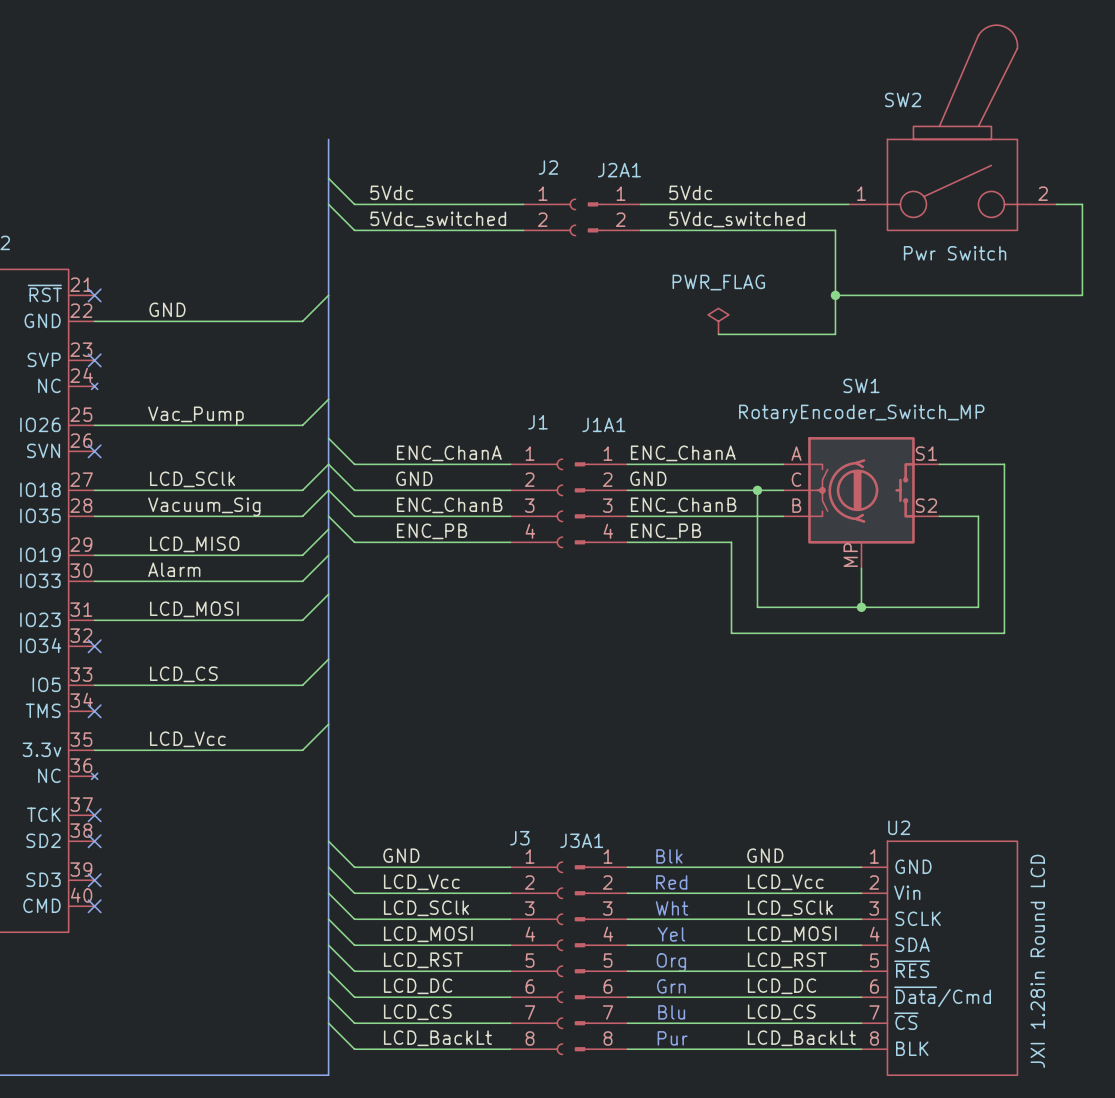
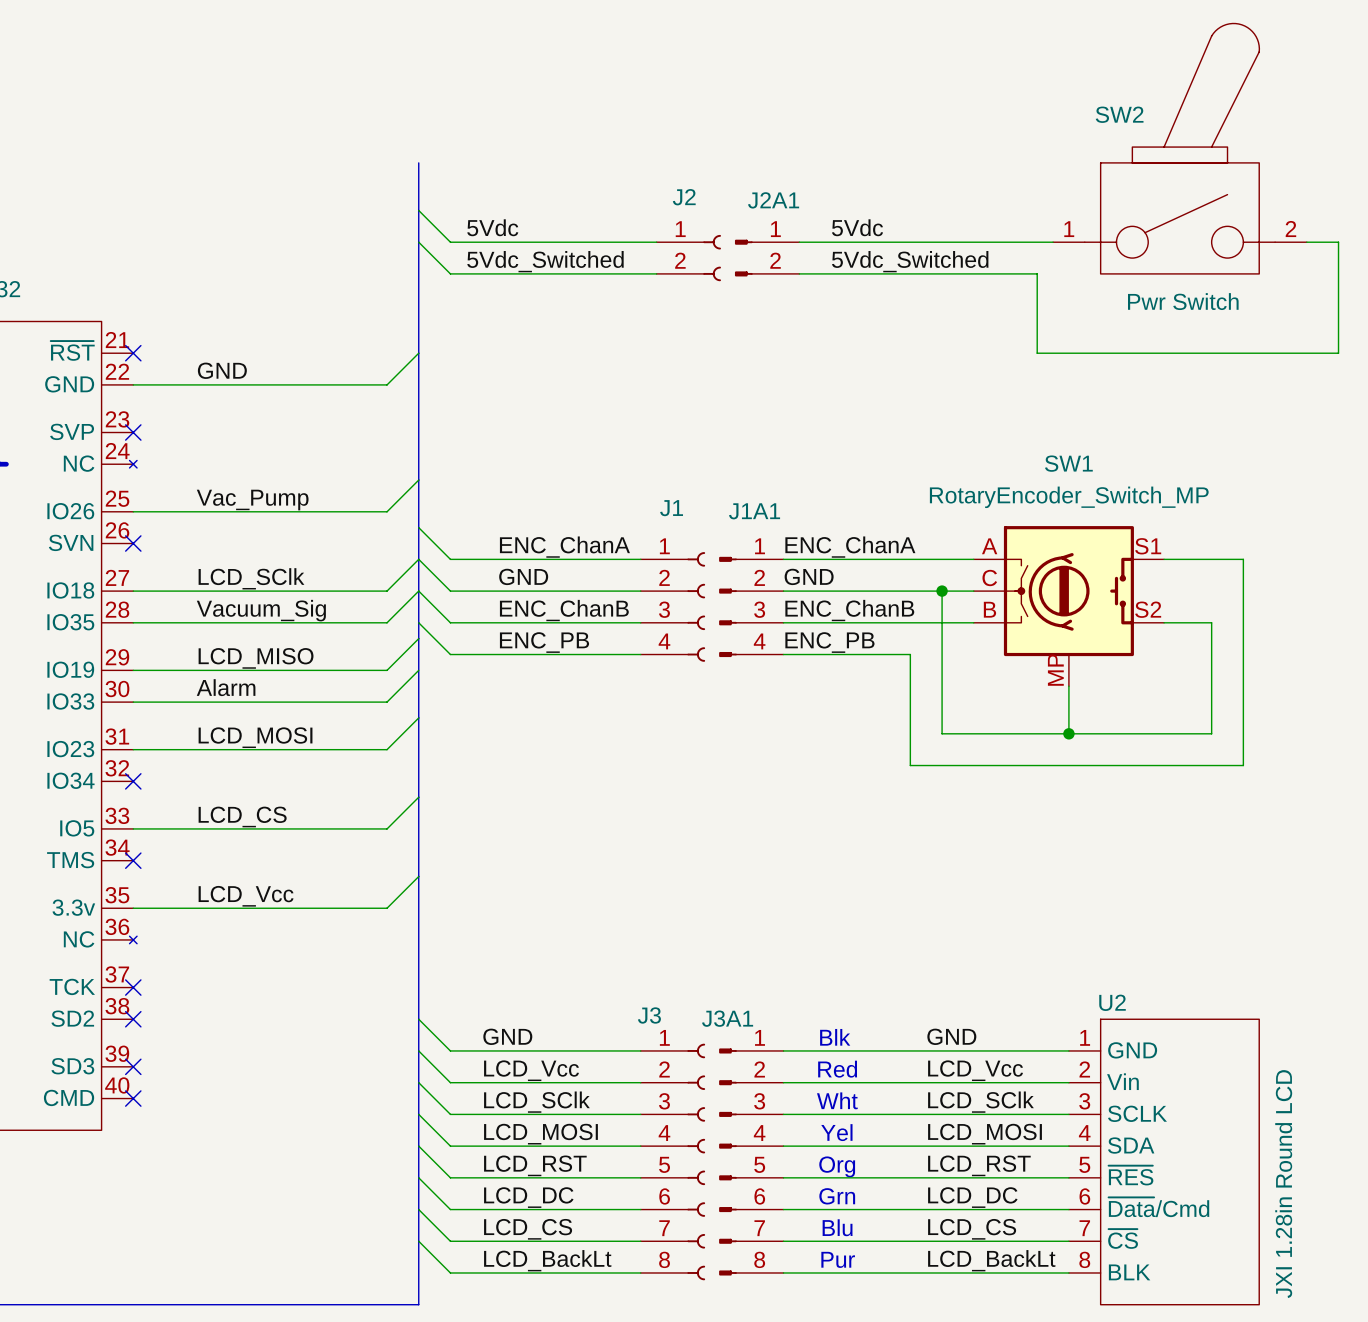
label: 5Vdc_switched (438, 219) -> 5Vdc_Switched (545, 261)
label: 5Vdc_switched (737, 219) -> 5Vdc_Switched (910, 261)
wire: (835, 295) (835, 334) (718, 334) -> none
junction: (835, 295) -> none
power symbol: PWR_FLAG (718, 321) -> none

